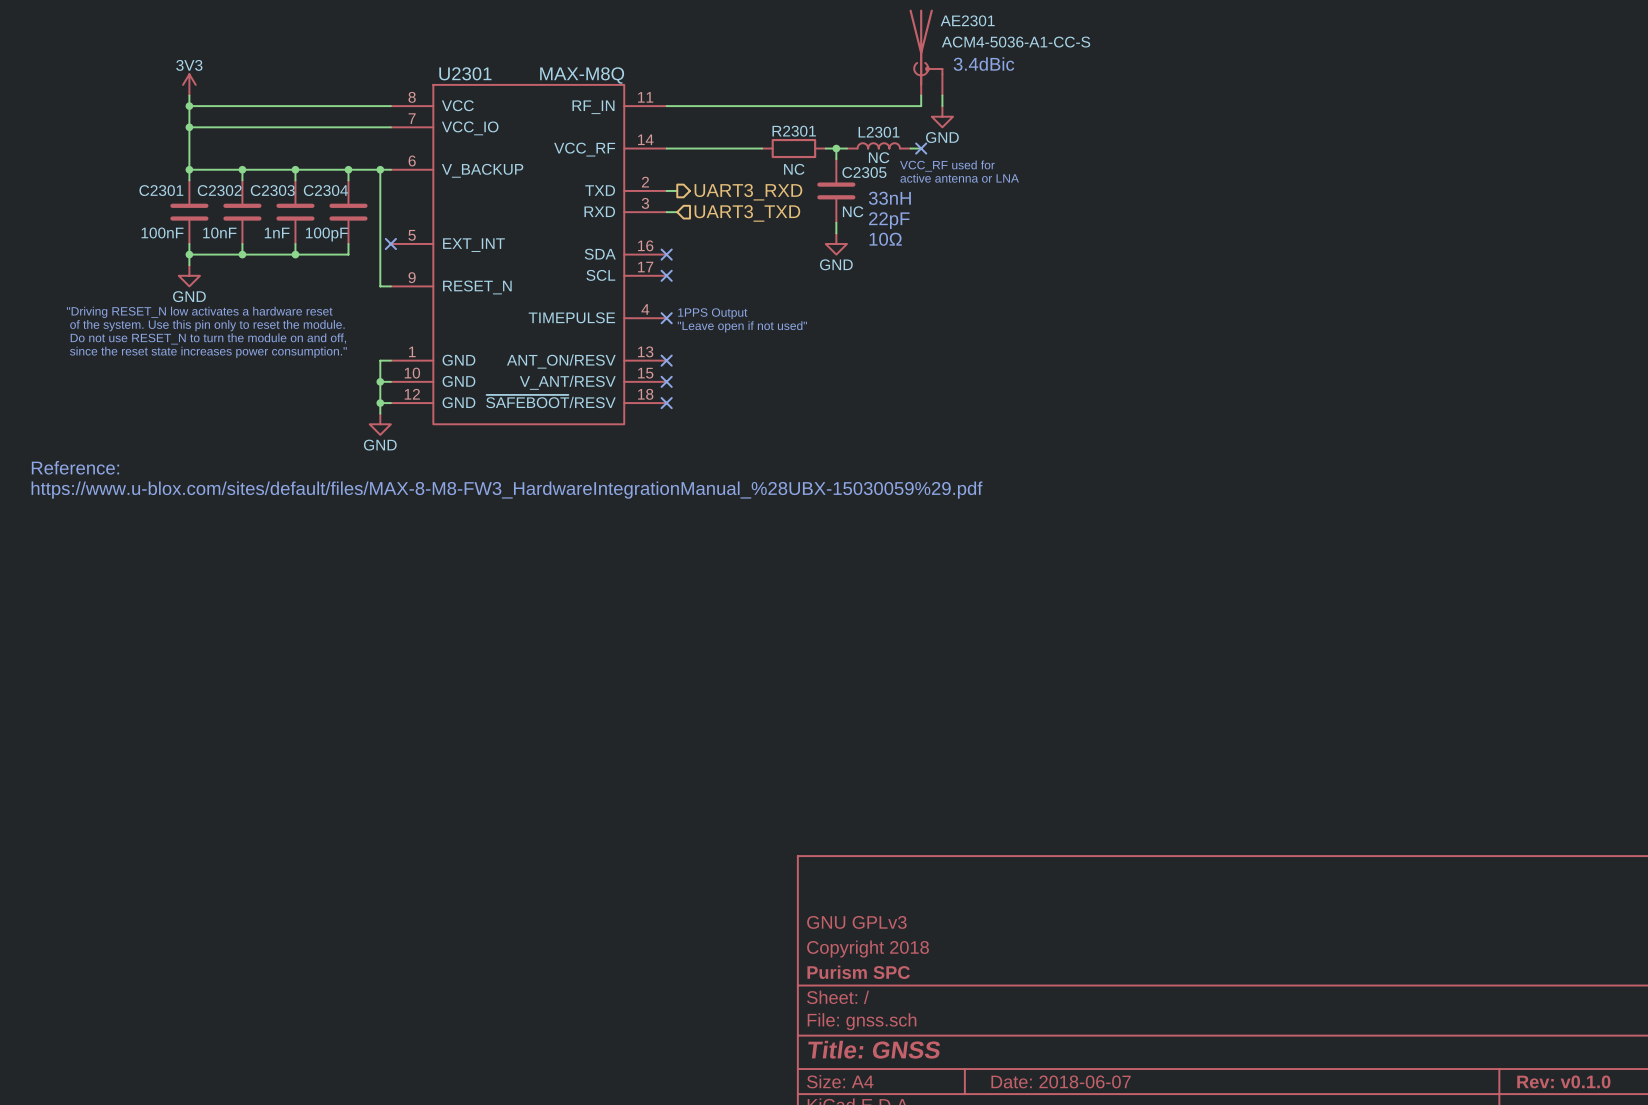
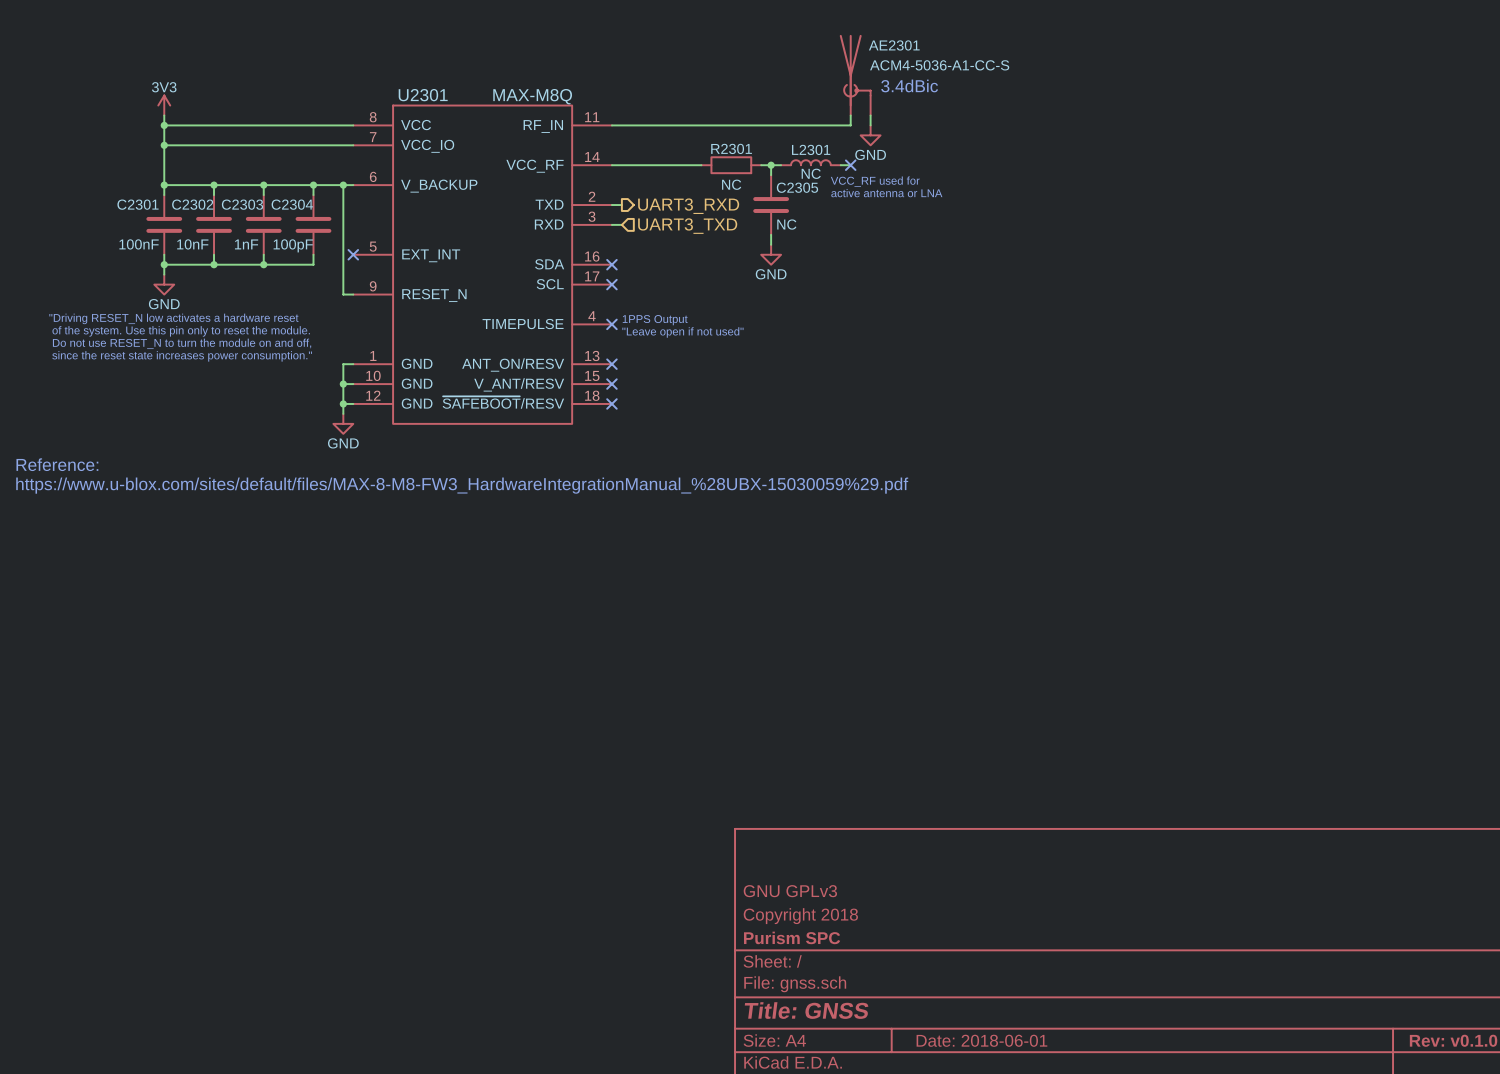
text: 33nH (889, 198) -> none
text: 22pF (889, 220) -> none
text: 10Ω (885, 239) -> none
title block: Date: 2018-06-07 (1061, 1081) -> Date: 2018-06-01 (981, 1040)

